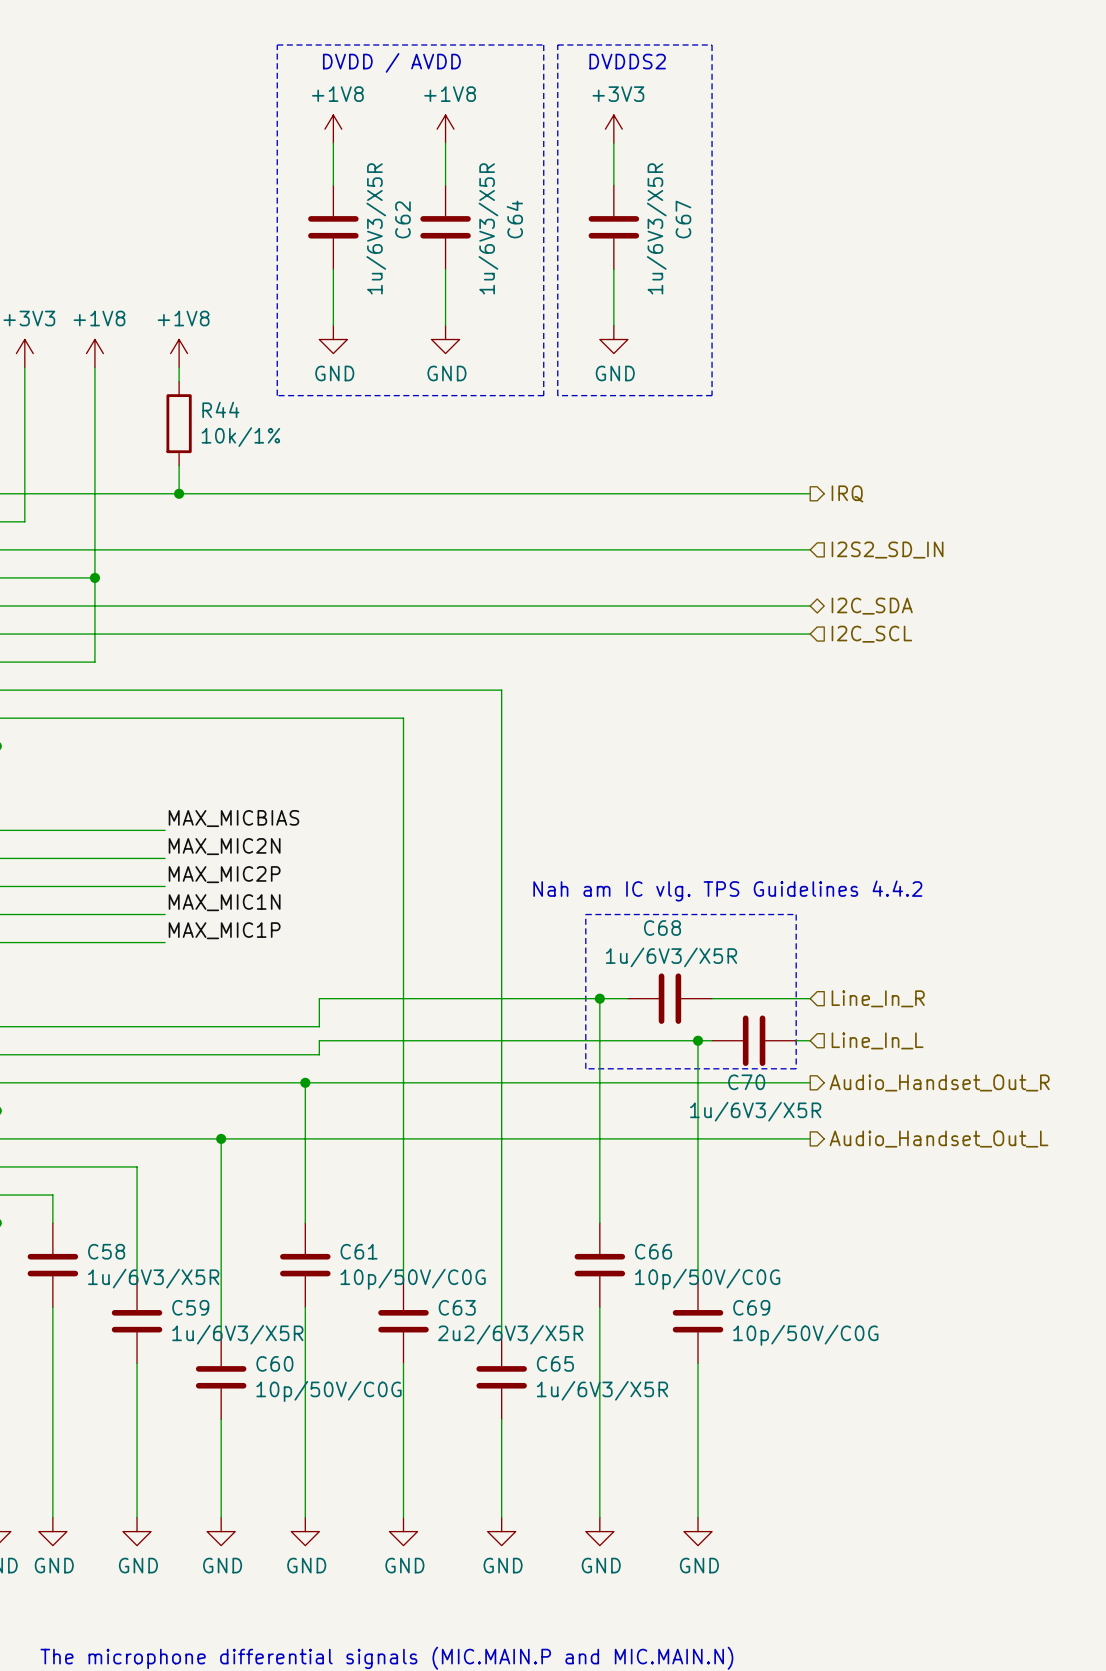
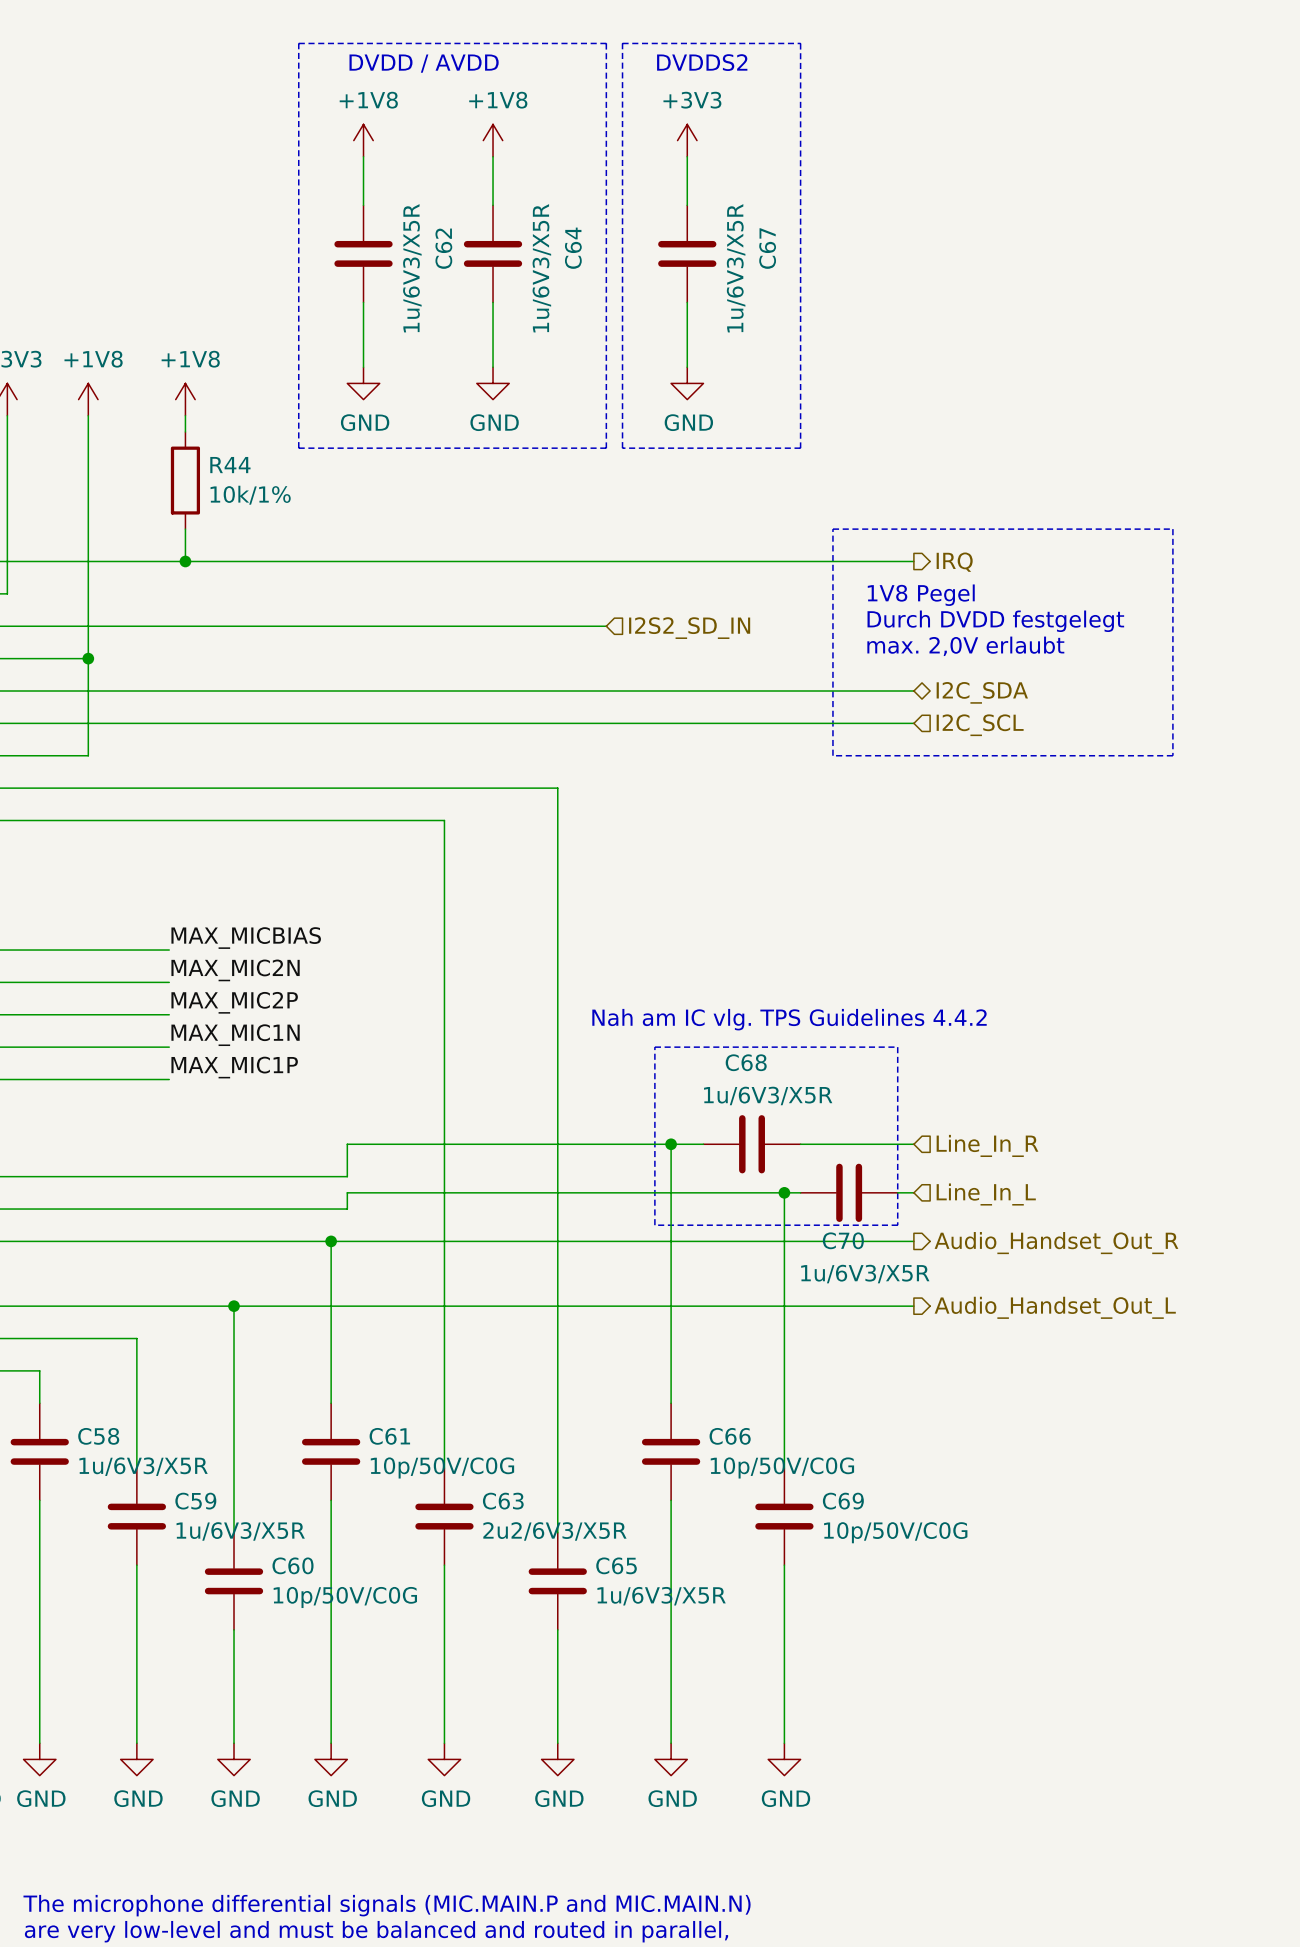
line: none -> (832, 529) (1172, 529) (1172, 755) (832, 755) (832, 529)
text: none -> 1V8 Pegel (921, 595)
text: none -> Durch DVDD festgelegt (995, 621)
wire: (543, 549) (810, 549) -> none
hierarchical label position: I2S2_SD_IN (887, 550) -> I2S2_SD_IN (689, 628)
text: none -> max. 2,0V erlaubt (965, 646)

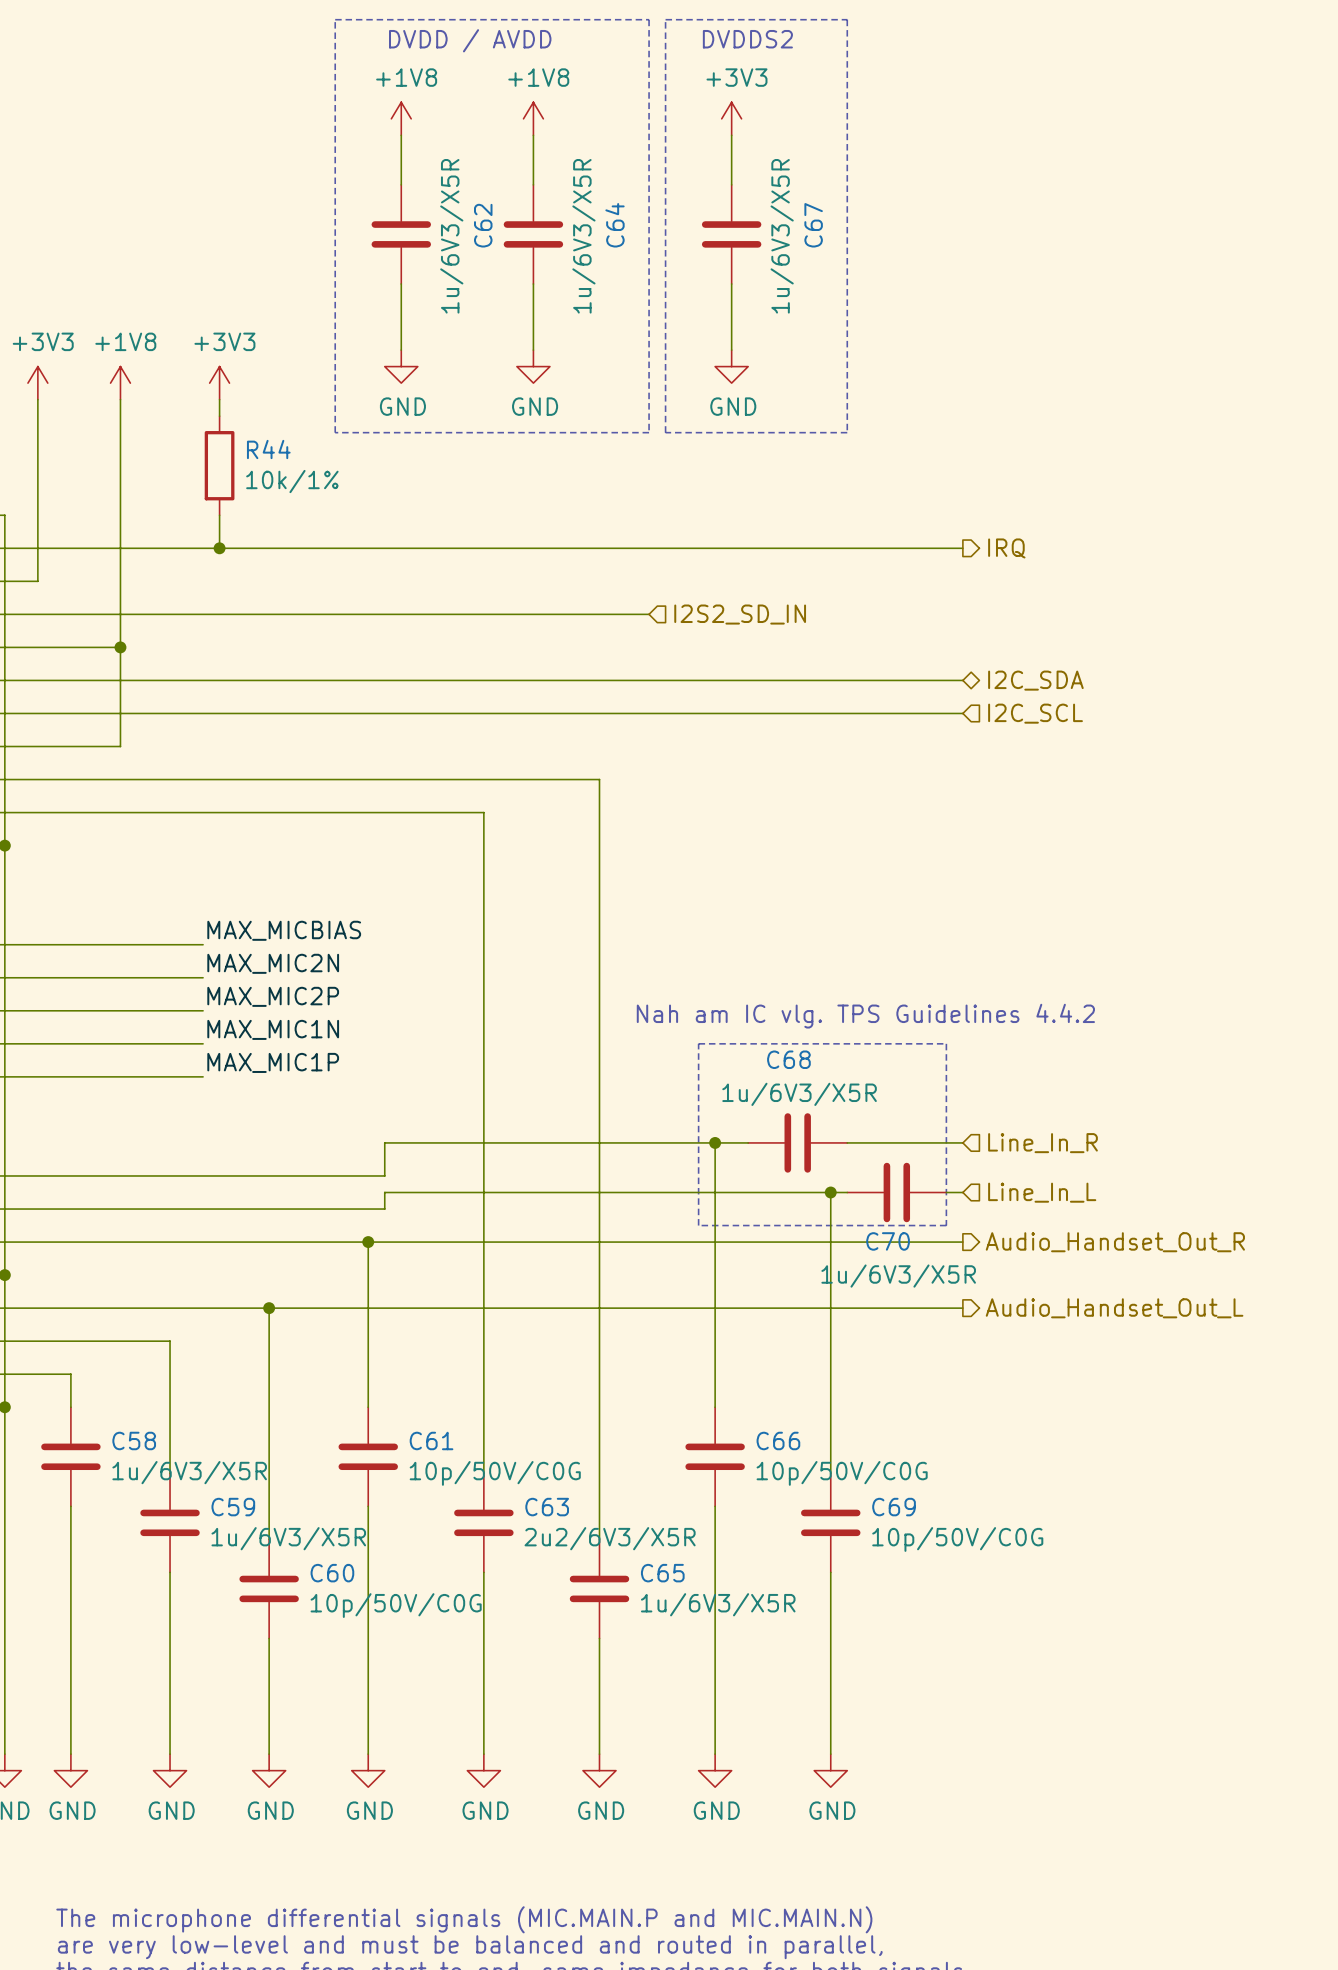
power symbol: +1V8 (185, 399) -> +3V3 (219, 383)
line: (832, 529) (1172, 529) (1172, 755) (832, 755) (832, 529) -> none
text: 1V8 Pegel (921, 595) -> none
text: Durch DVDD festgelegt (995, 621) -> none
text: max. 2,0V erlaubt (965, 646) -> none

